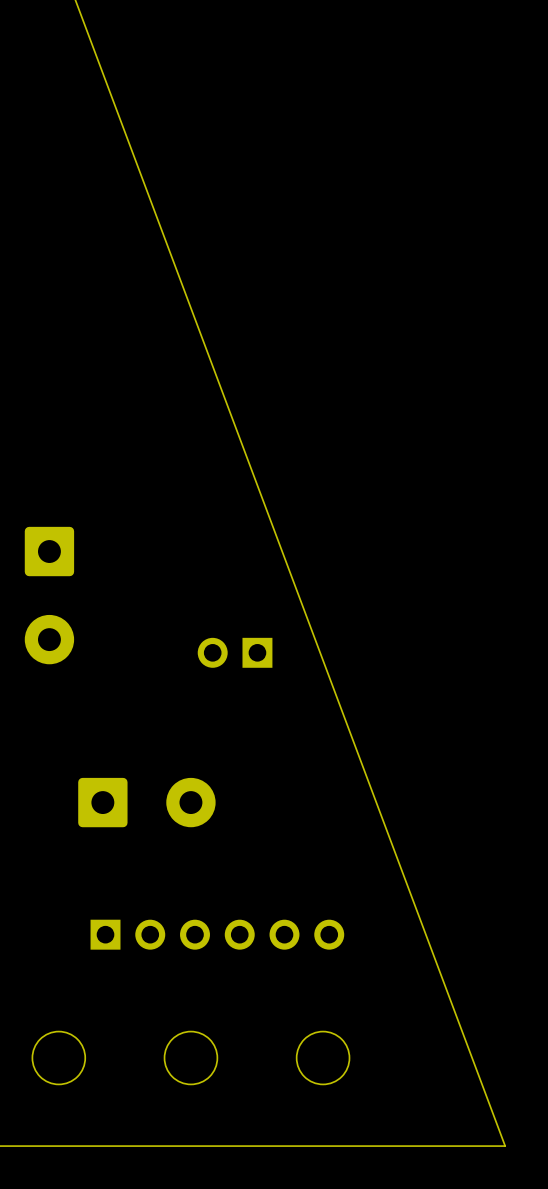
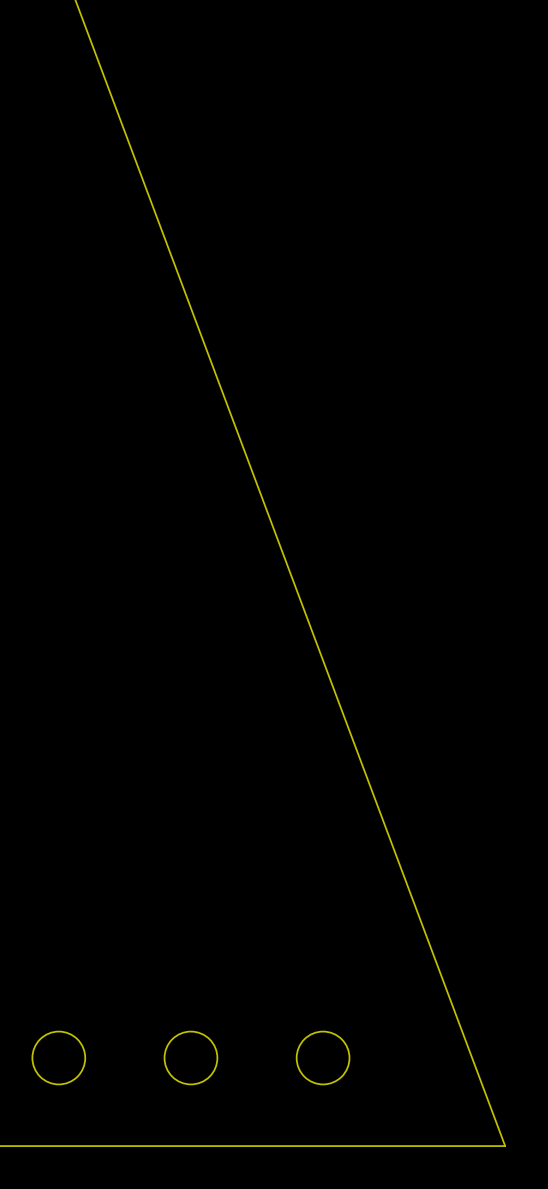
part: (49, 595) -> none
part: (235, 652) -> none
part: (146, 802) -> none
part: (217, 934) -> none

